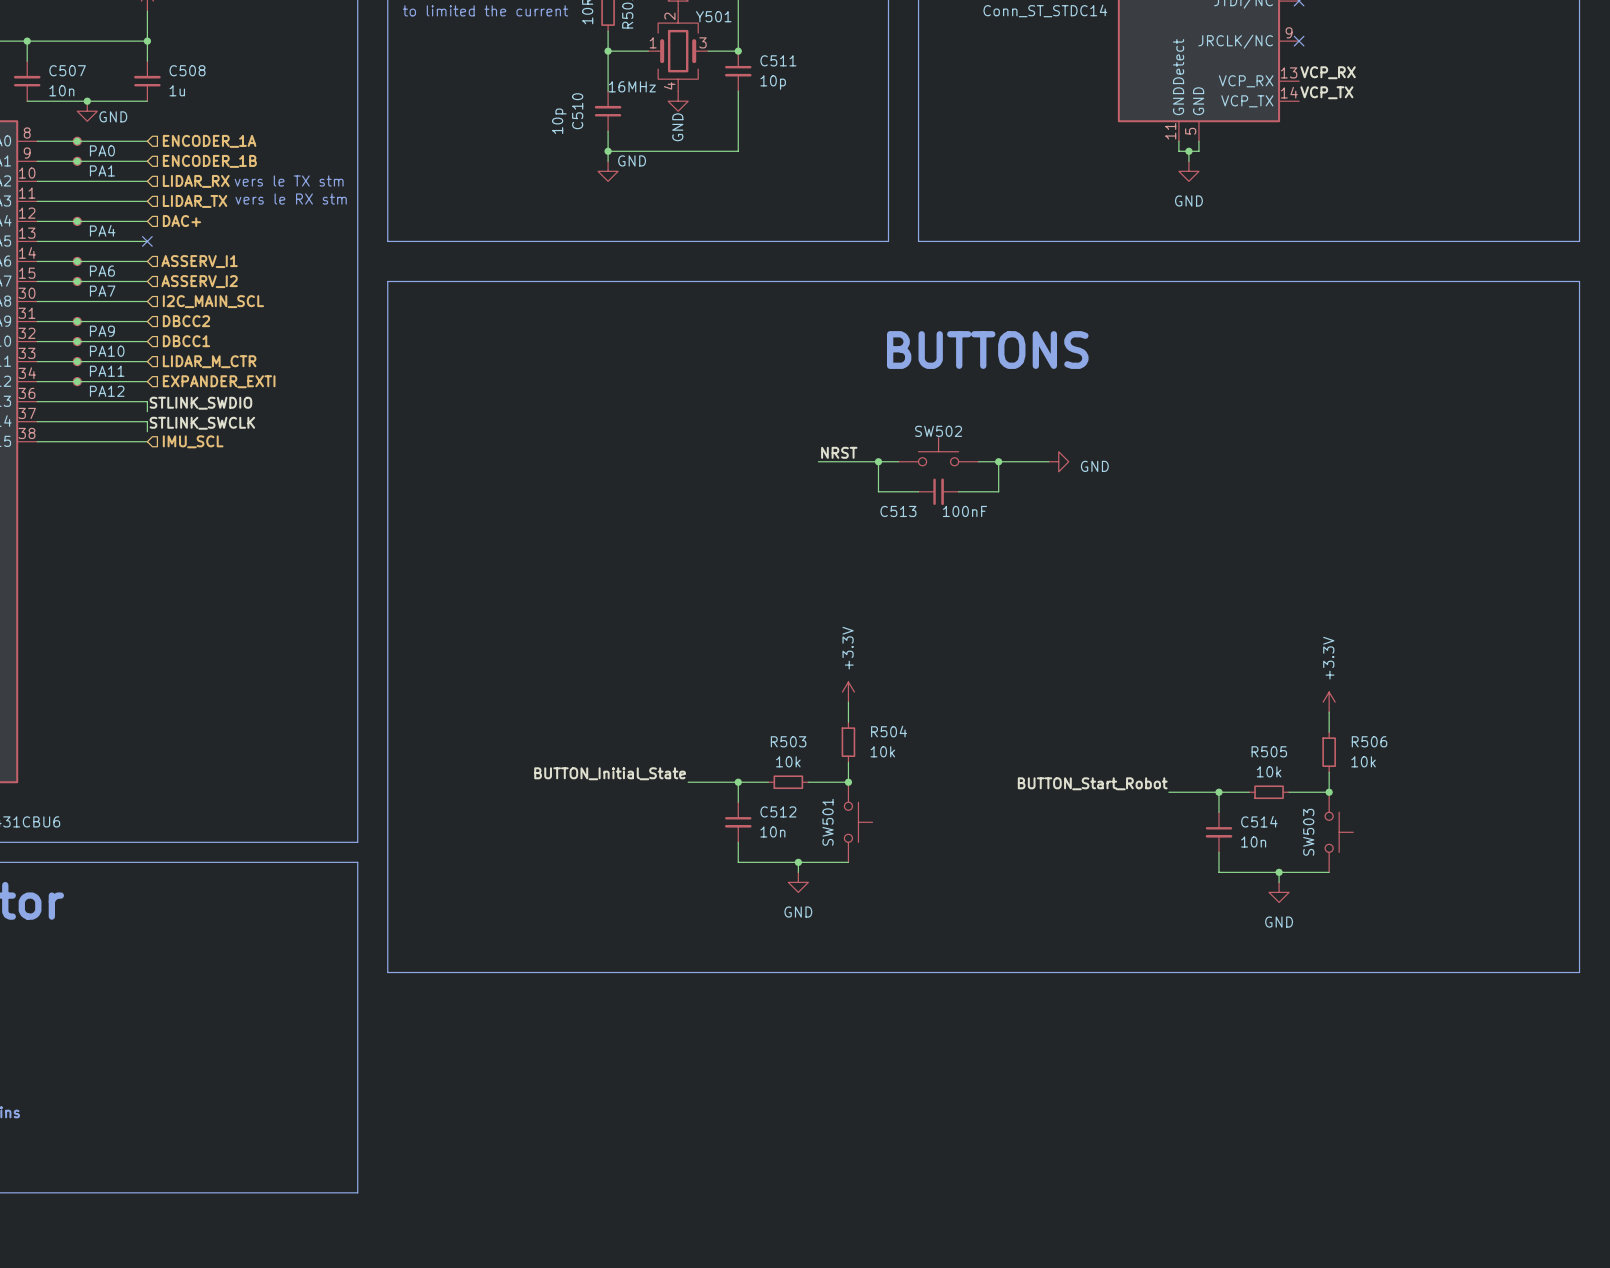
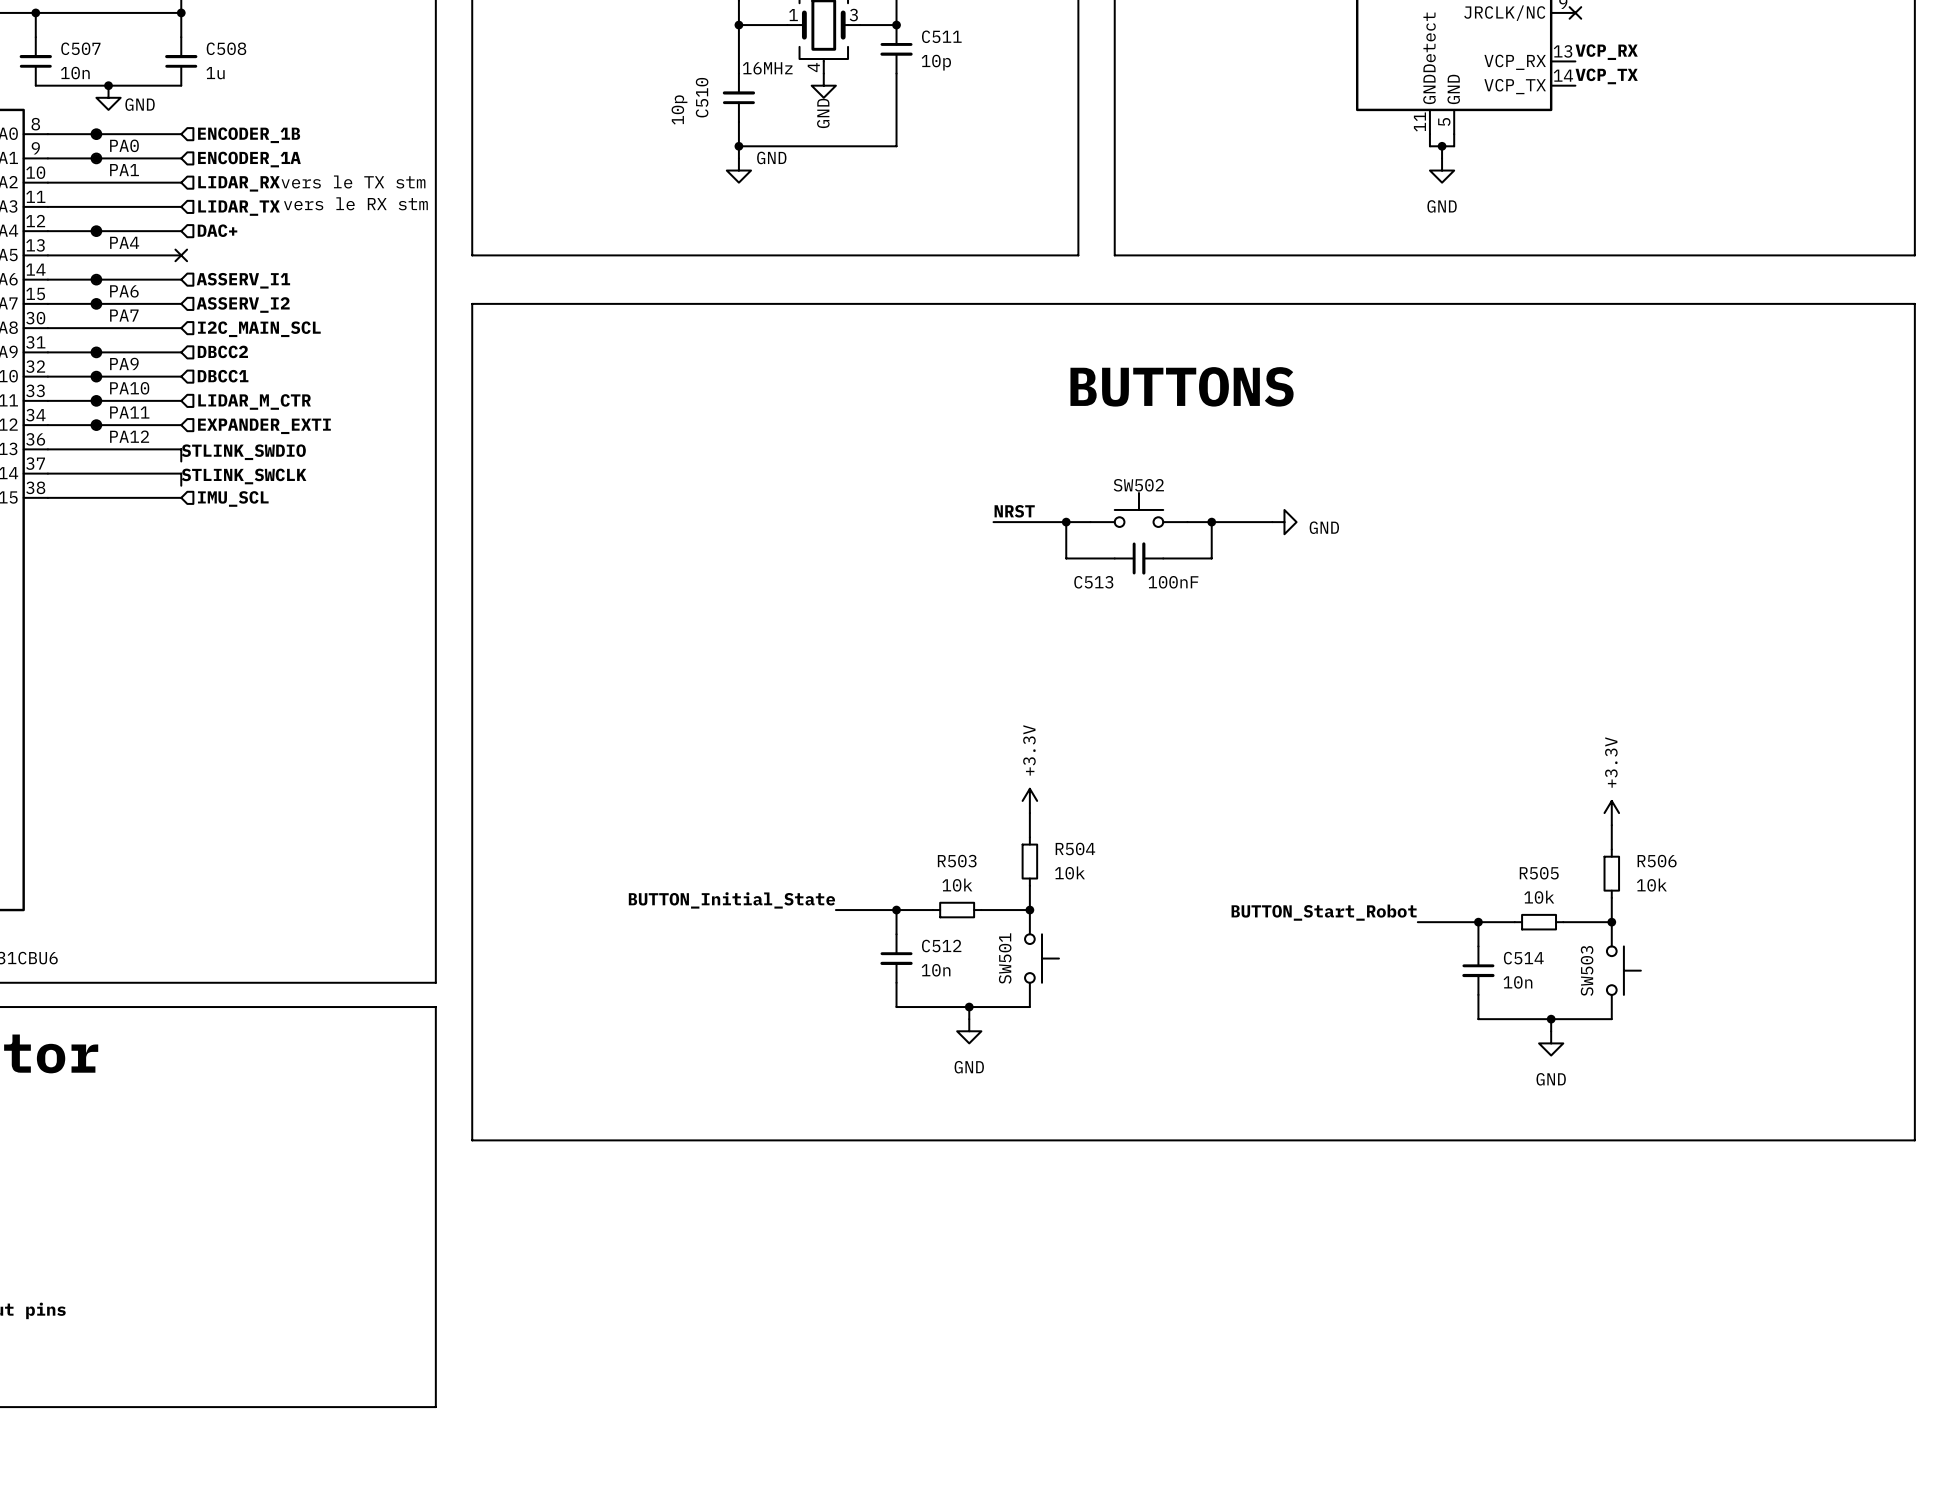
hierarchical label: ENCODER_1A (209, 141) -> ENCODER_1B (249, 135)
hierarchical label: ENCODER_1B (209, 161) -> ENCODER_1A (249, 159)

